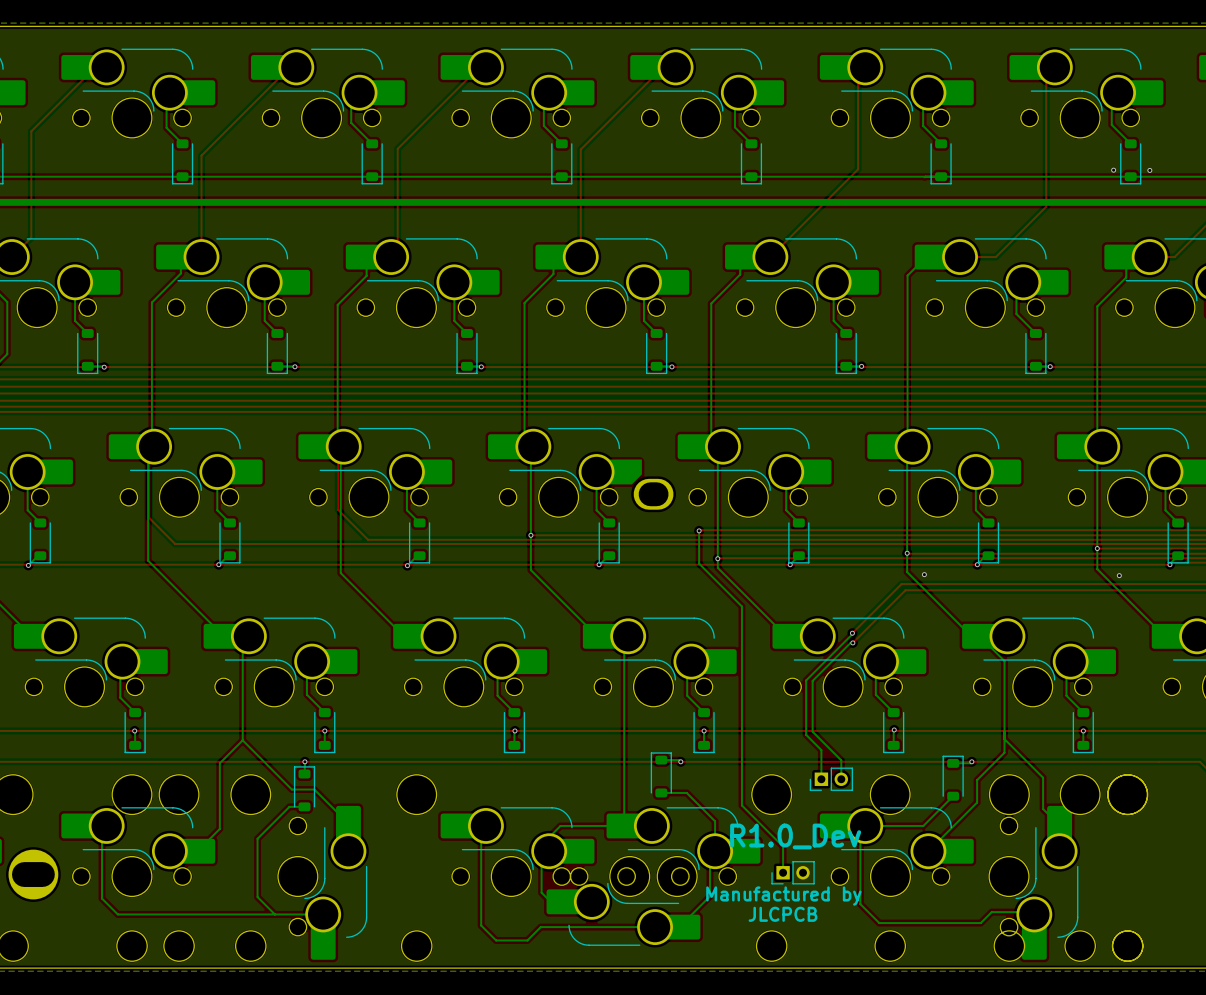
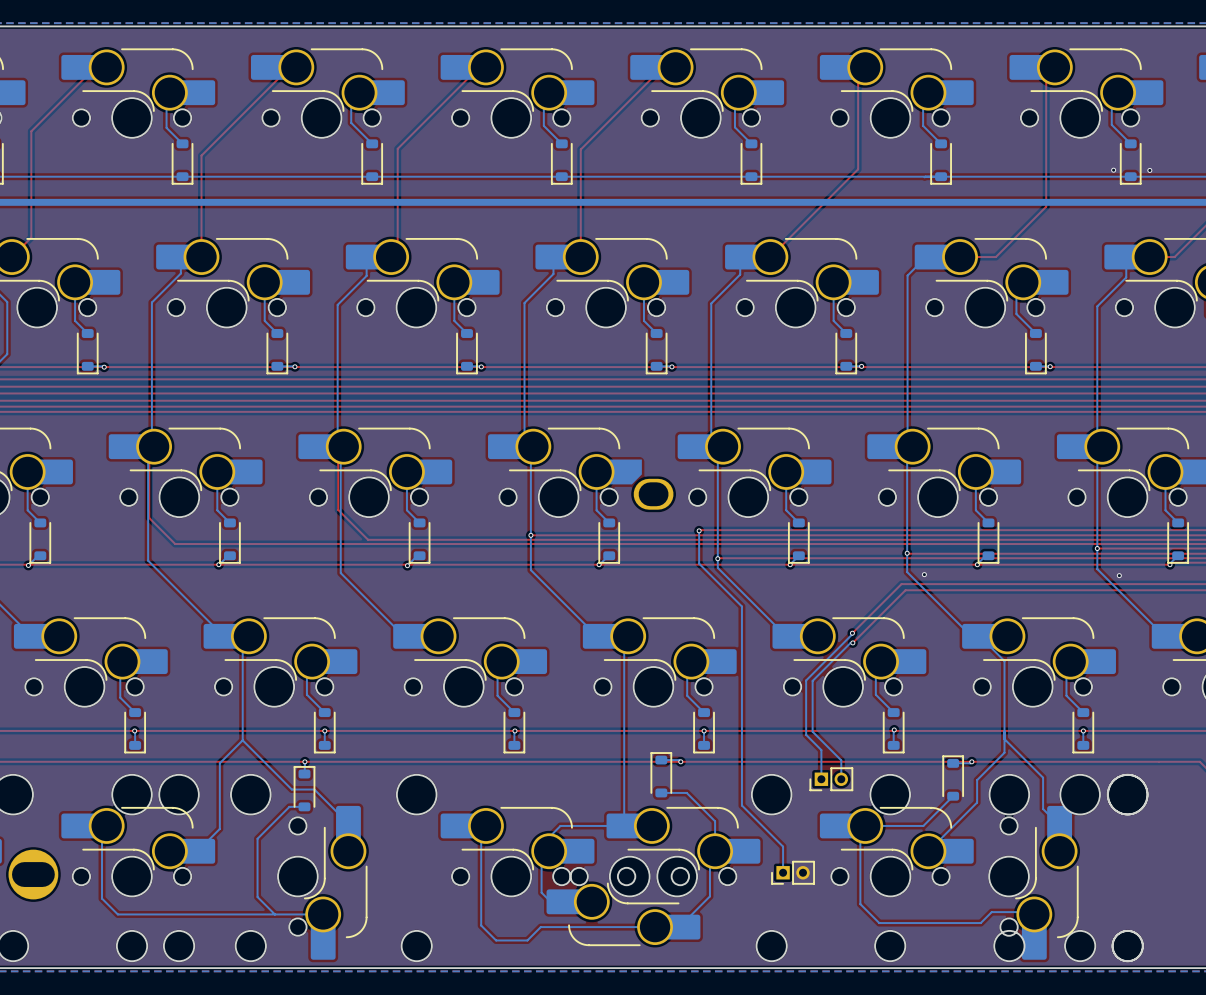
text: R1.0_Dev (795, 836) -> none
text: Manufactured by (783, 896) -> none
text: JLCPCB (782, 914) -> none

